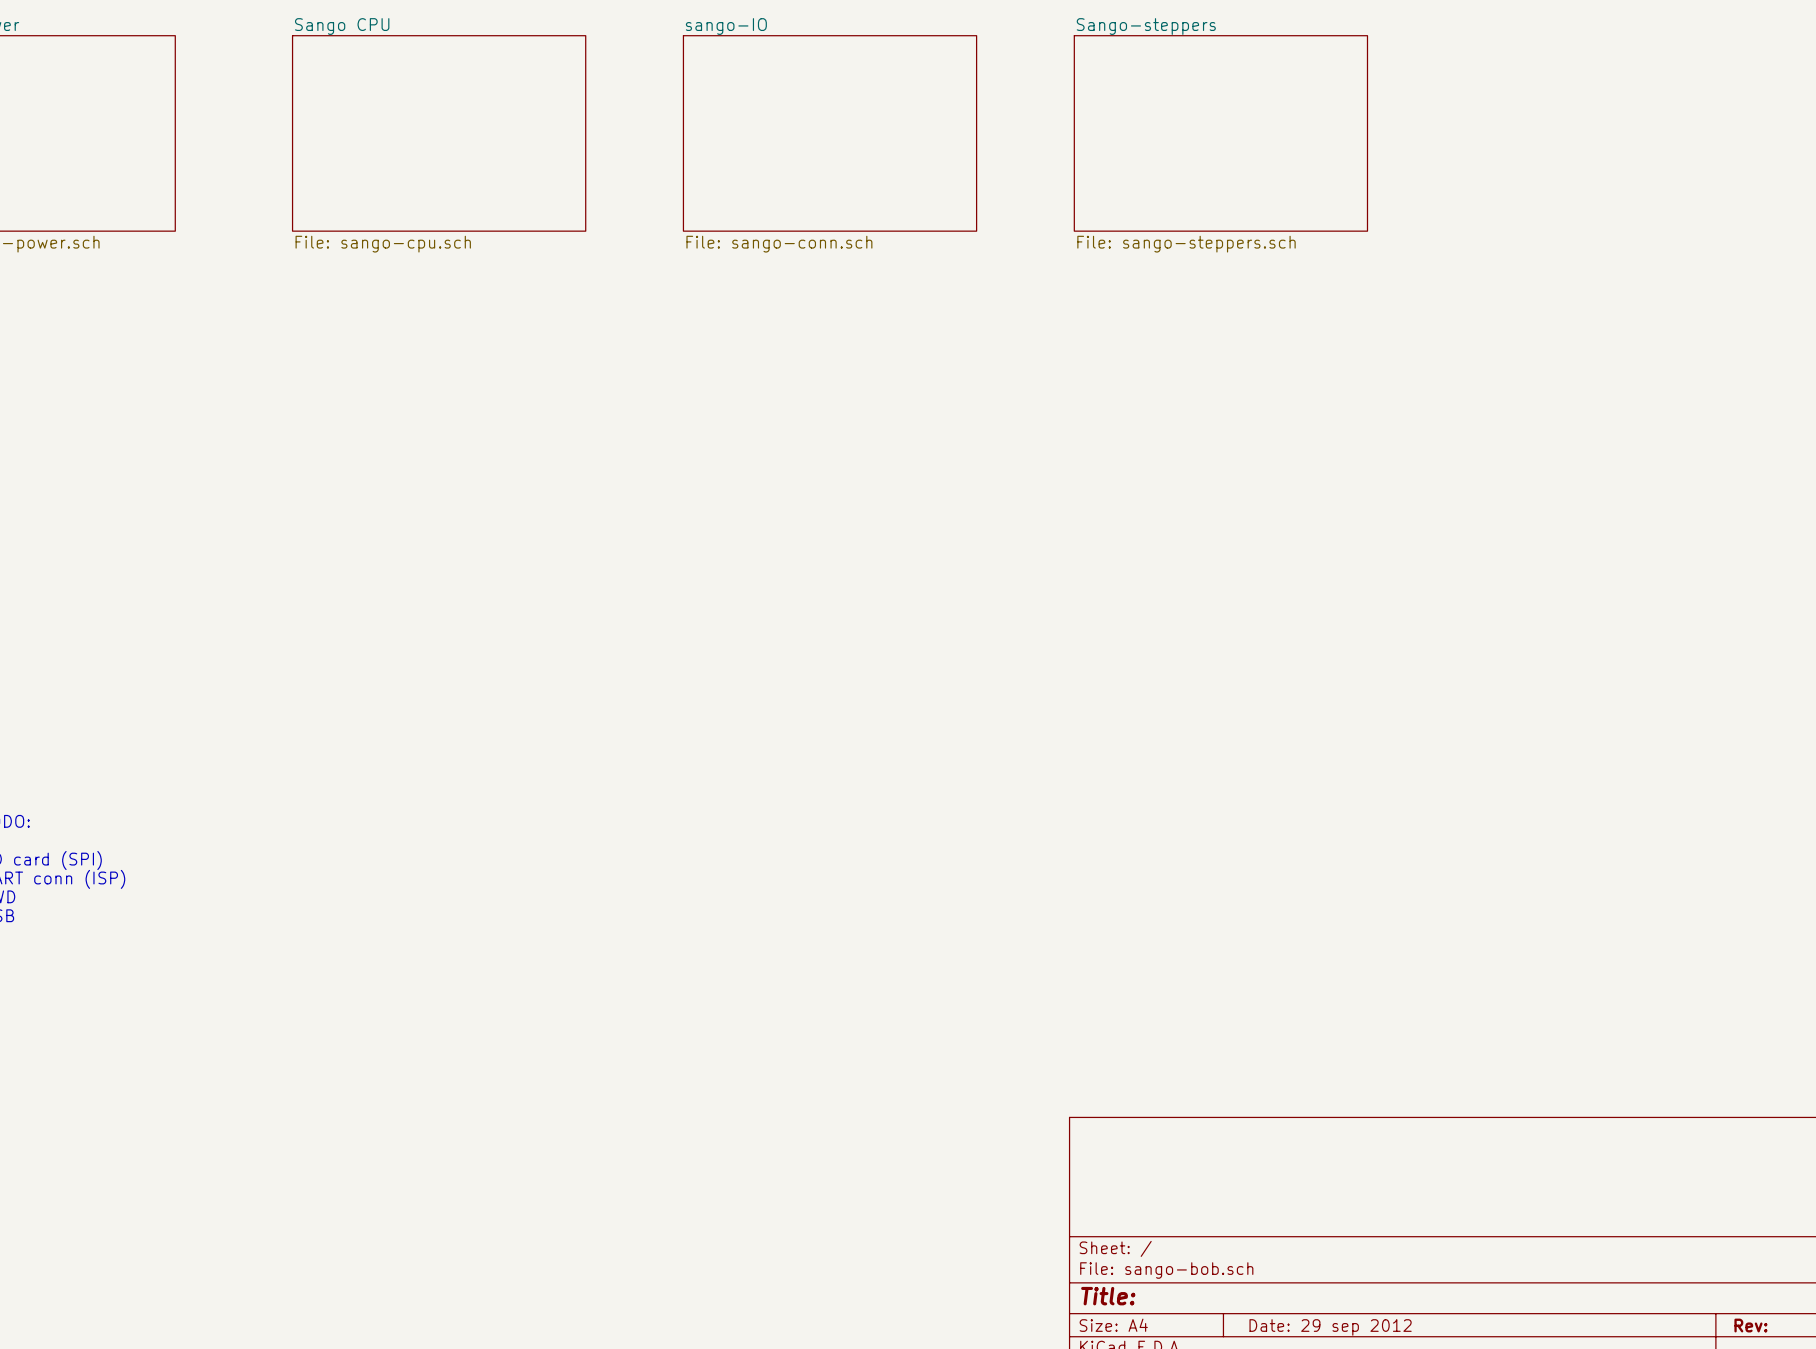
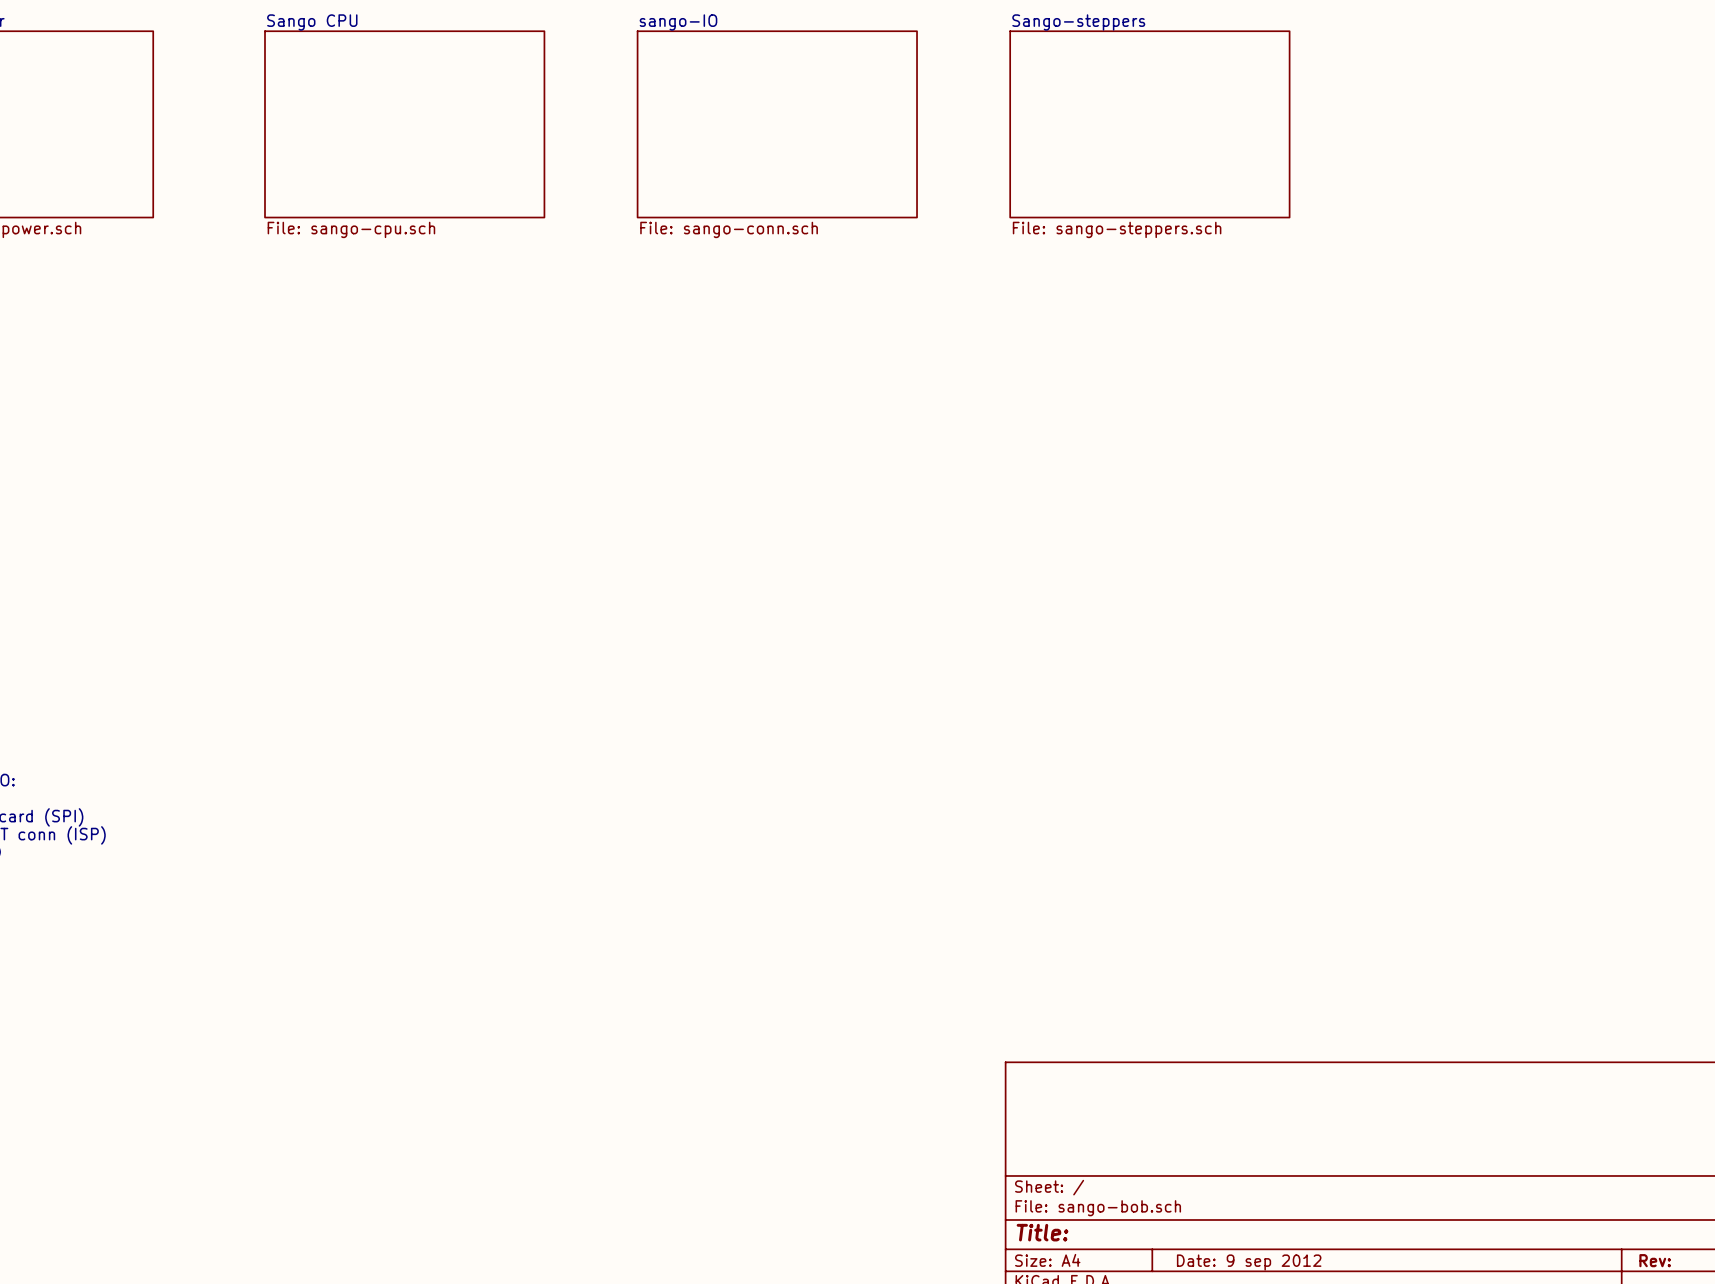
title block: Date: 29 sep 2012 (1330, 1327) -> Date: 9 sep 2012 (1249, 1262)

